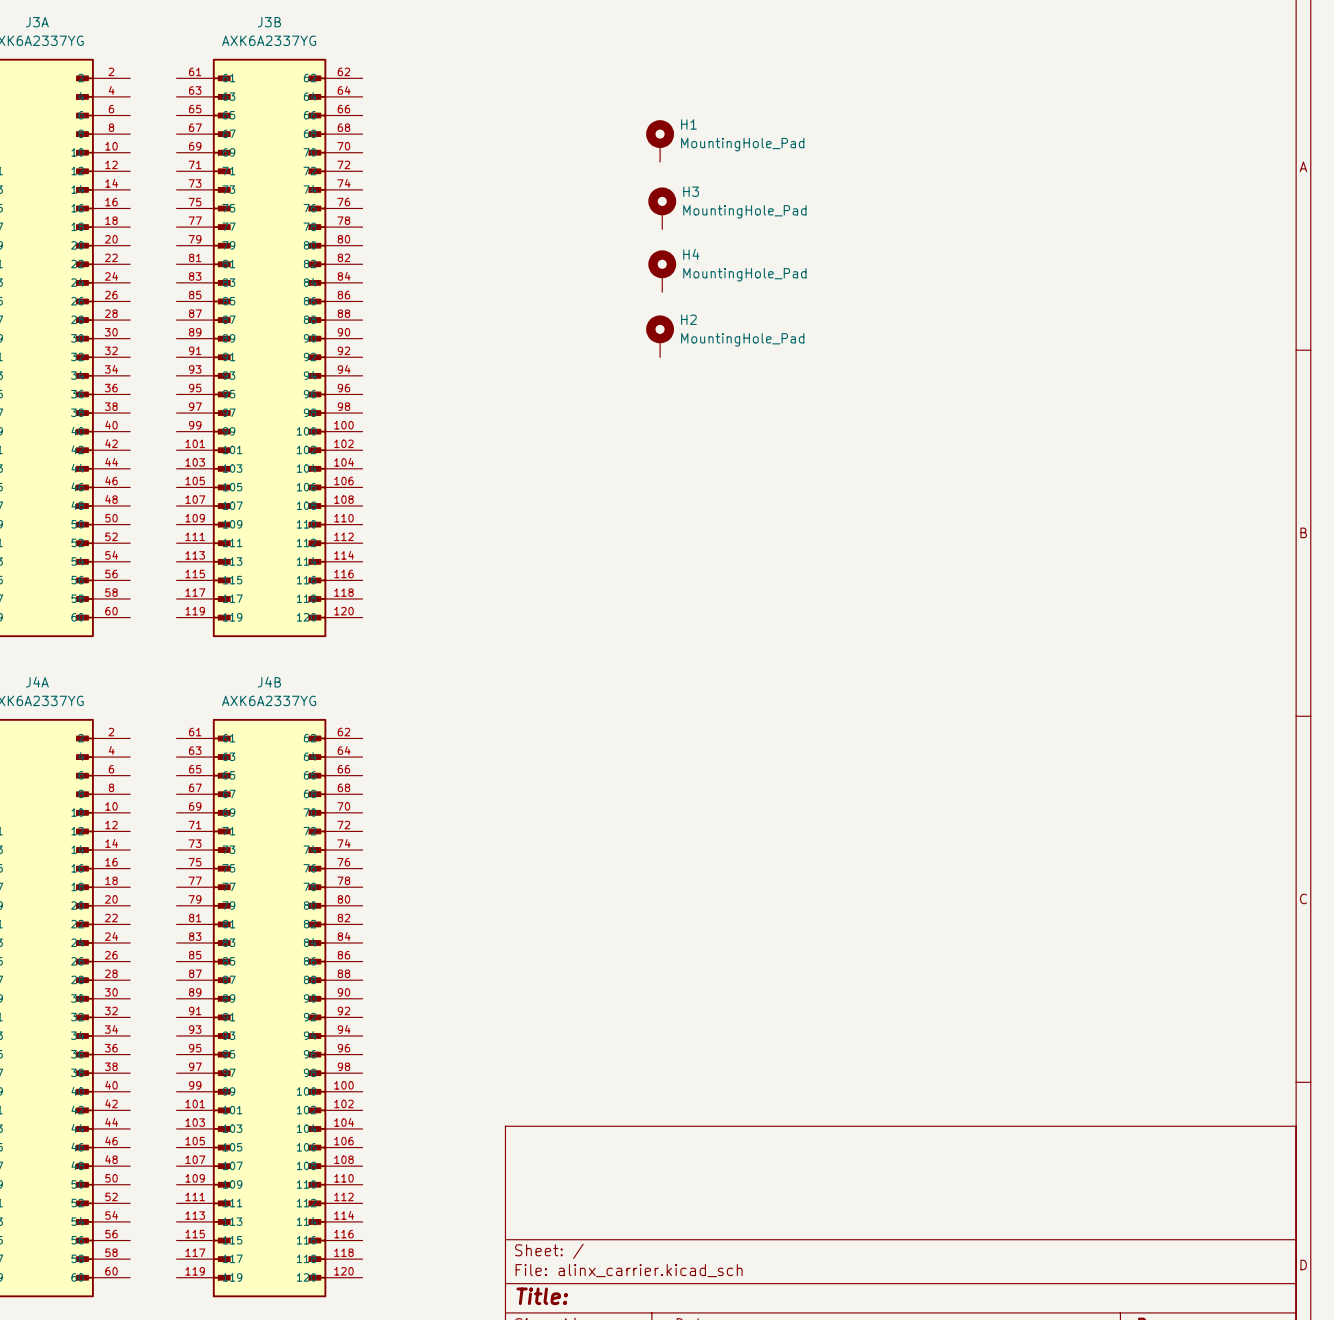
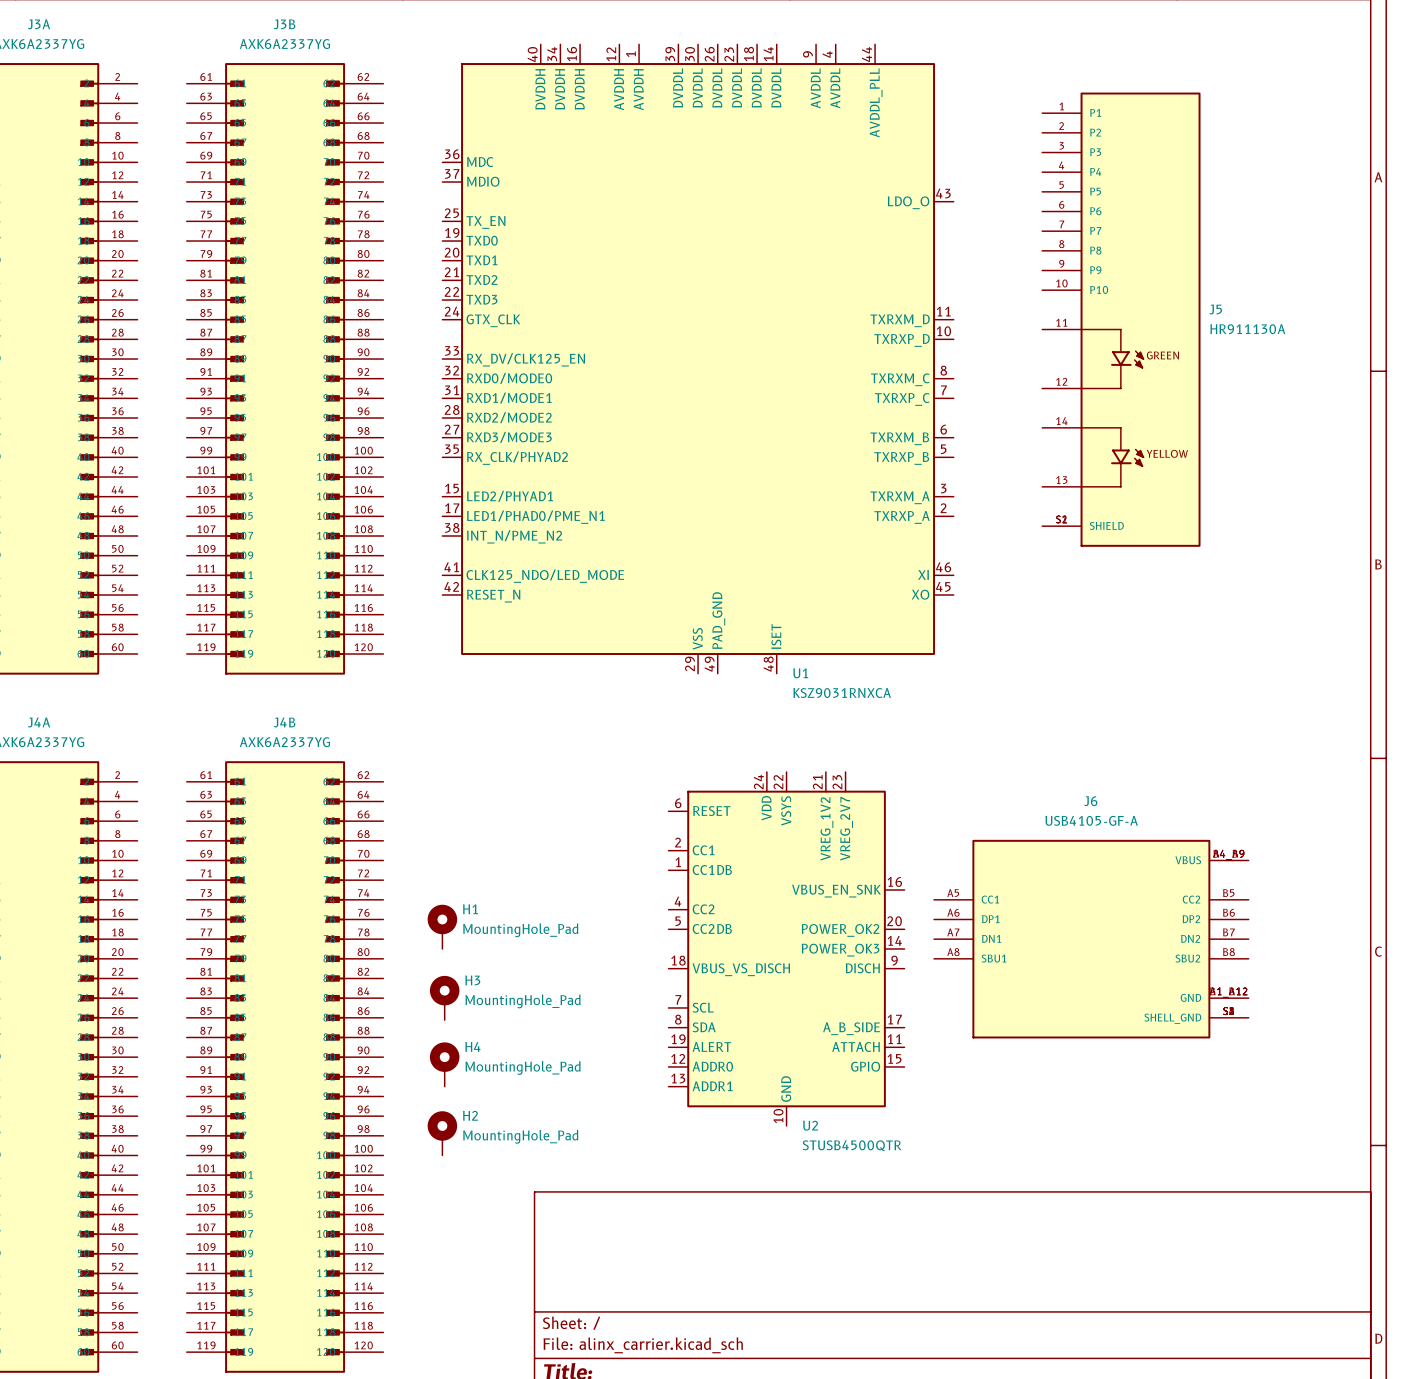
H1 position: (660, 141) -> (442, 926)
H3 position: (662, 208) -> (444, 998)
H4 position: (662, 271) -> (444, 1064)
J5: none -> HR911130A (1121, 319)
H2 position: (660, 336) -> (442, 1133)
U1: none -> KSZ9031RNXCA (698, 359)
J6: none -> USB4105-GF-A (1091, 939)
U2: none -> STUSB4500QTR (786, 948)

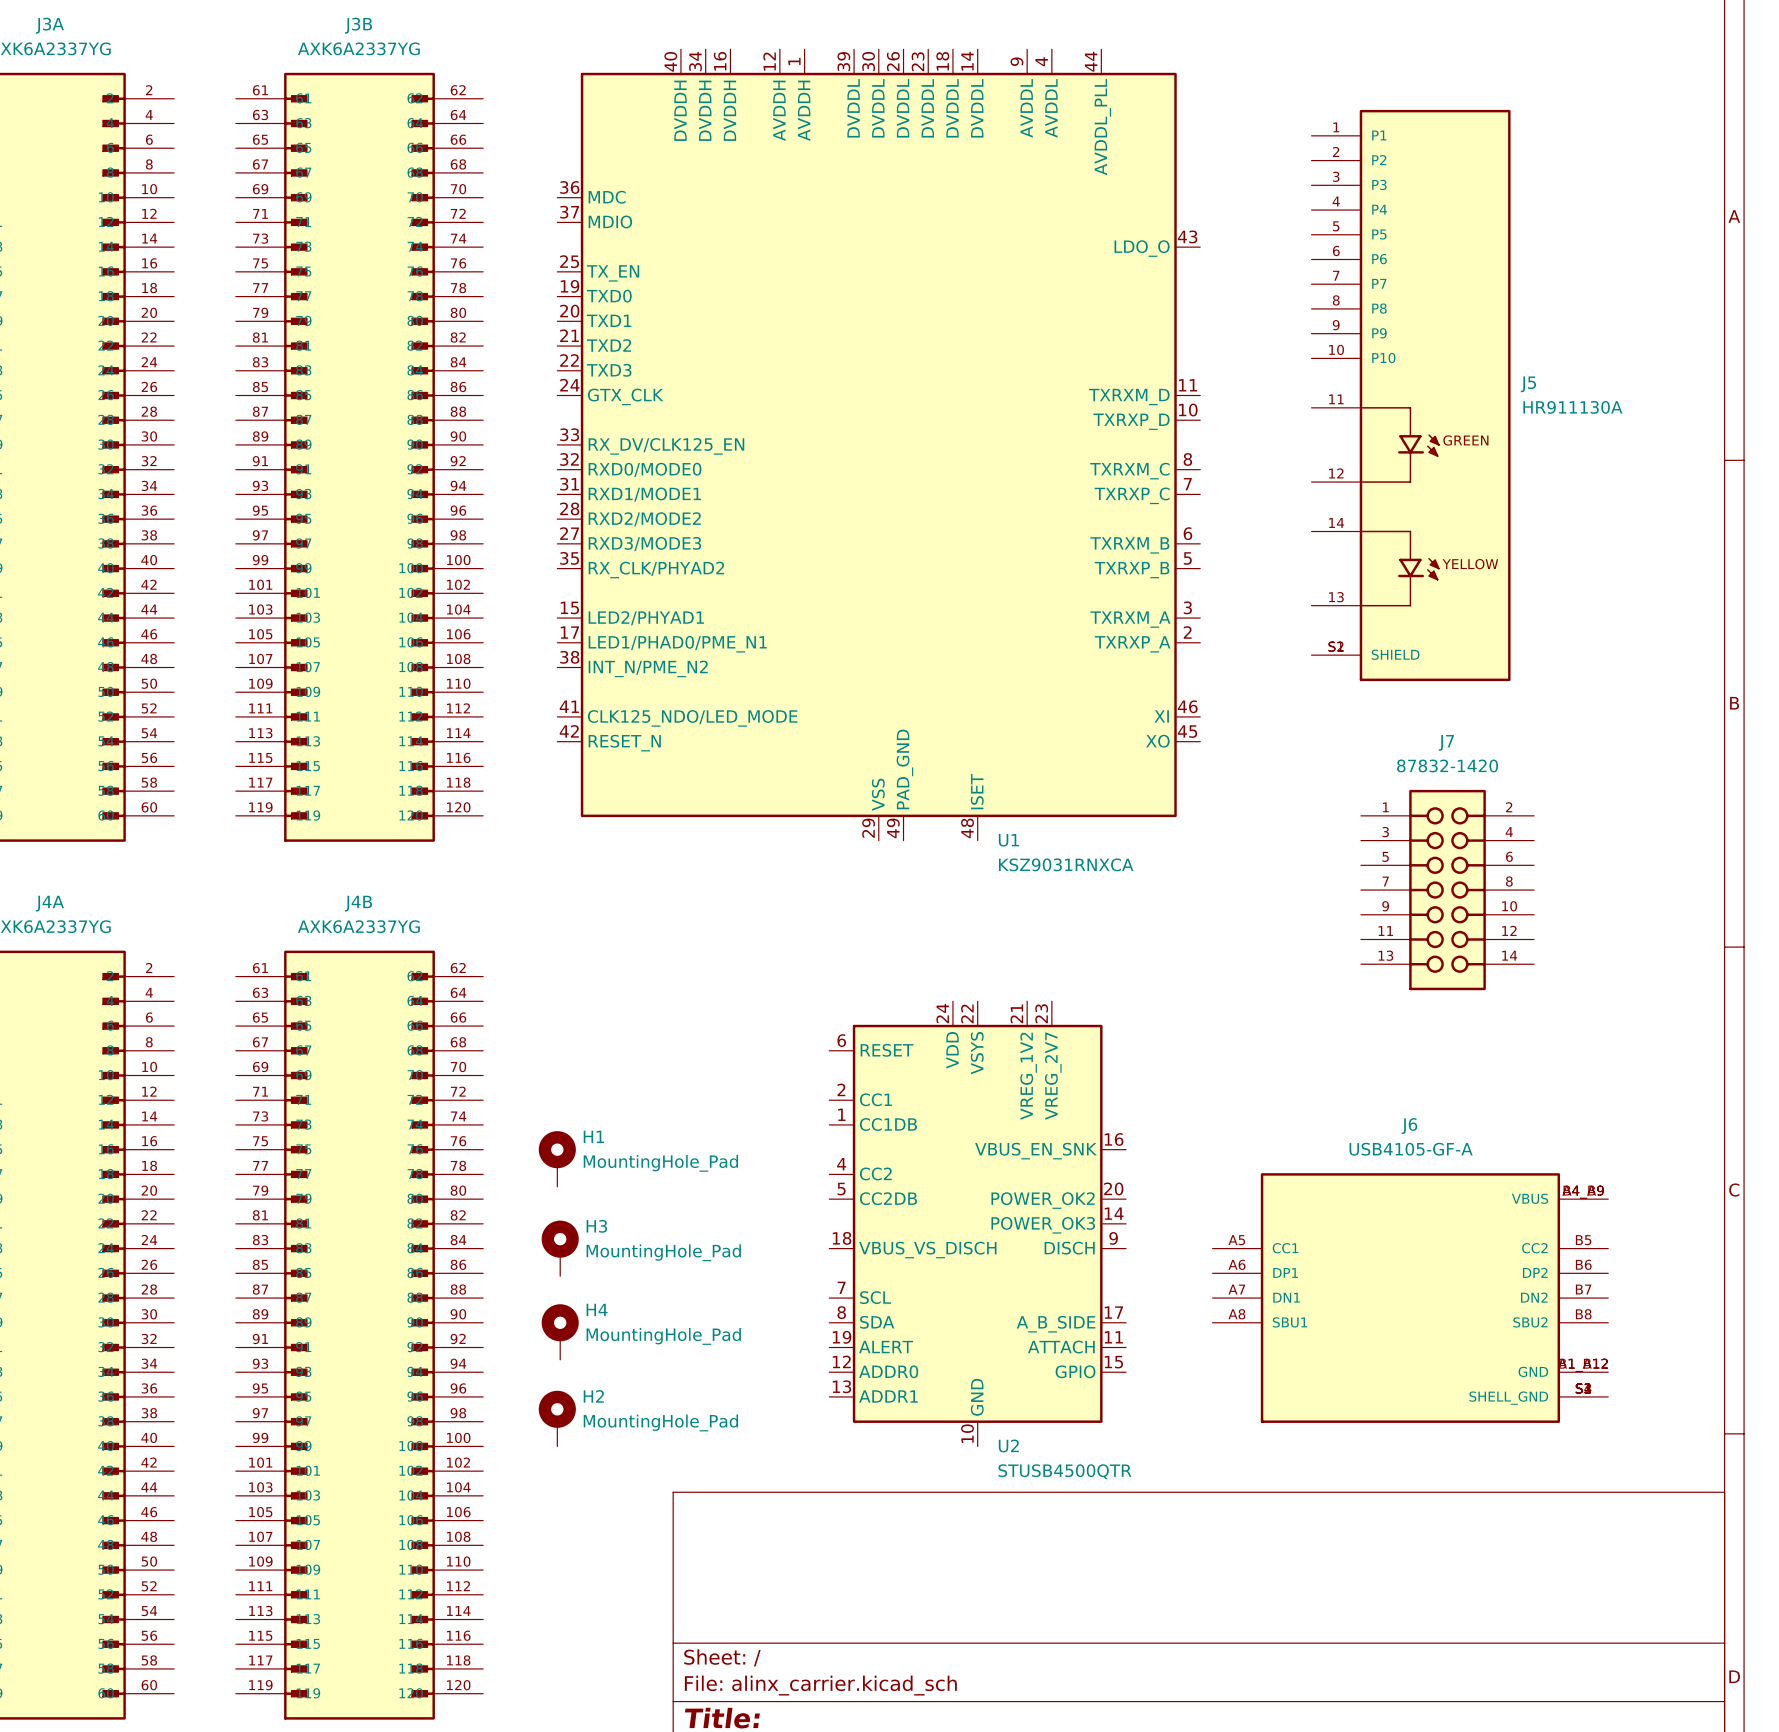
J7: none -> 87832-1420 (1447, 890)
J6 position: (1091, 939) -> (1410, 1298)
U2 position: (786, 948) -> (977, 1223)

